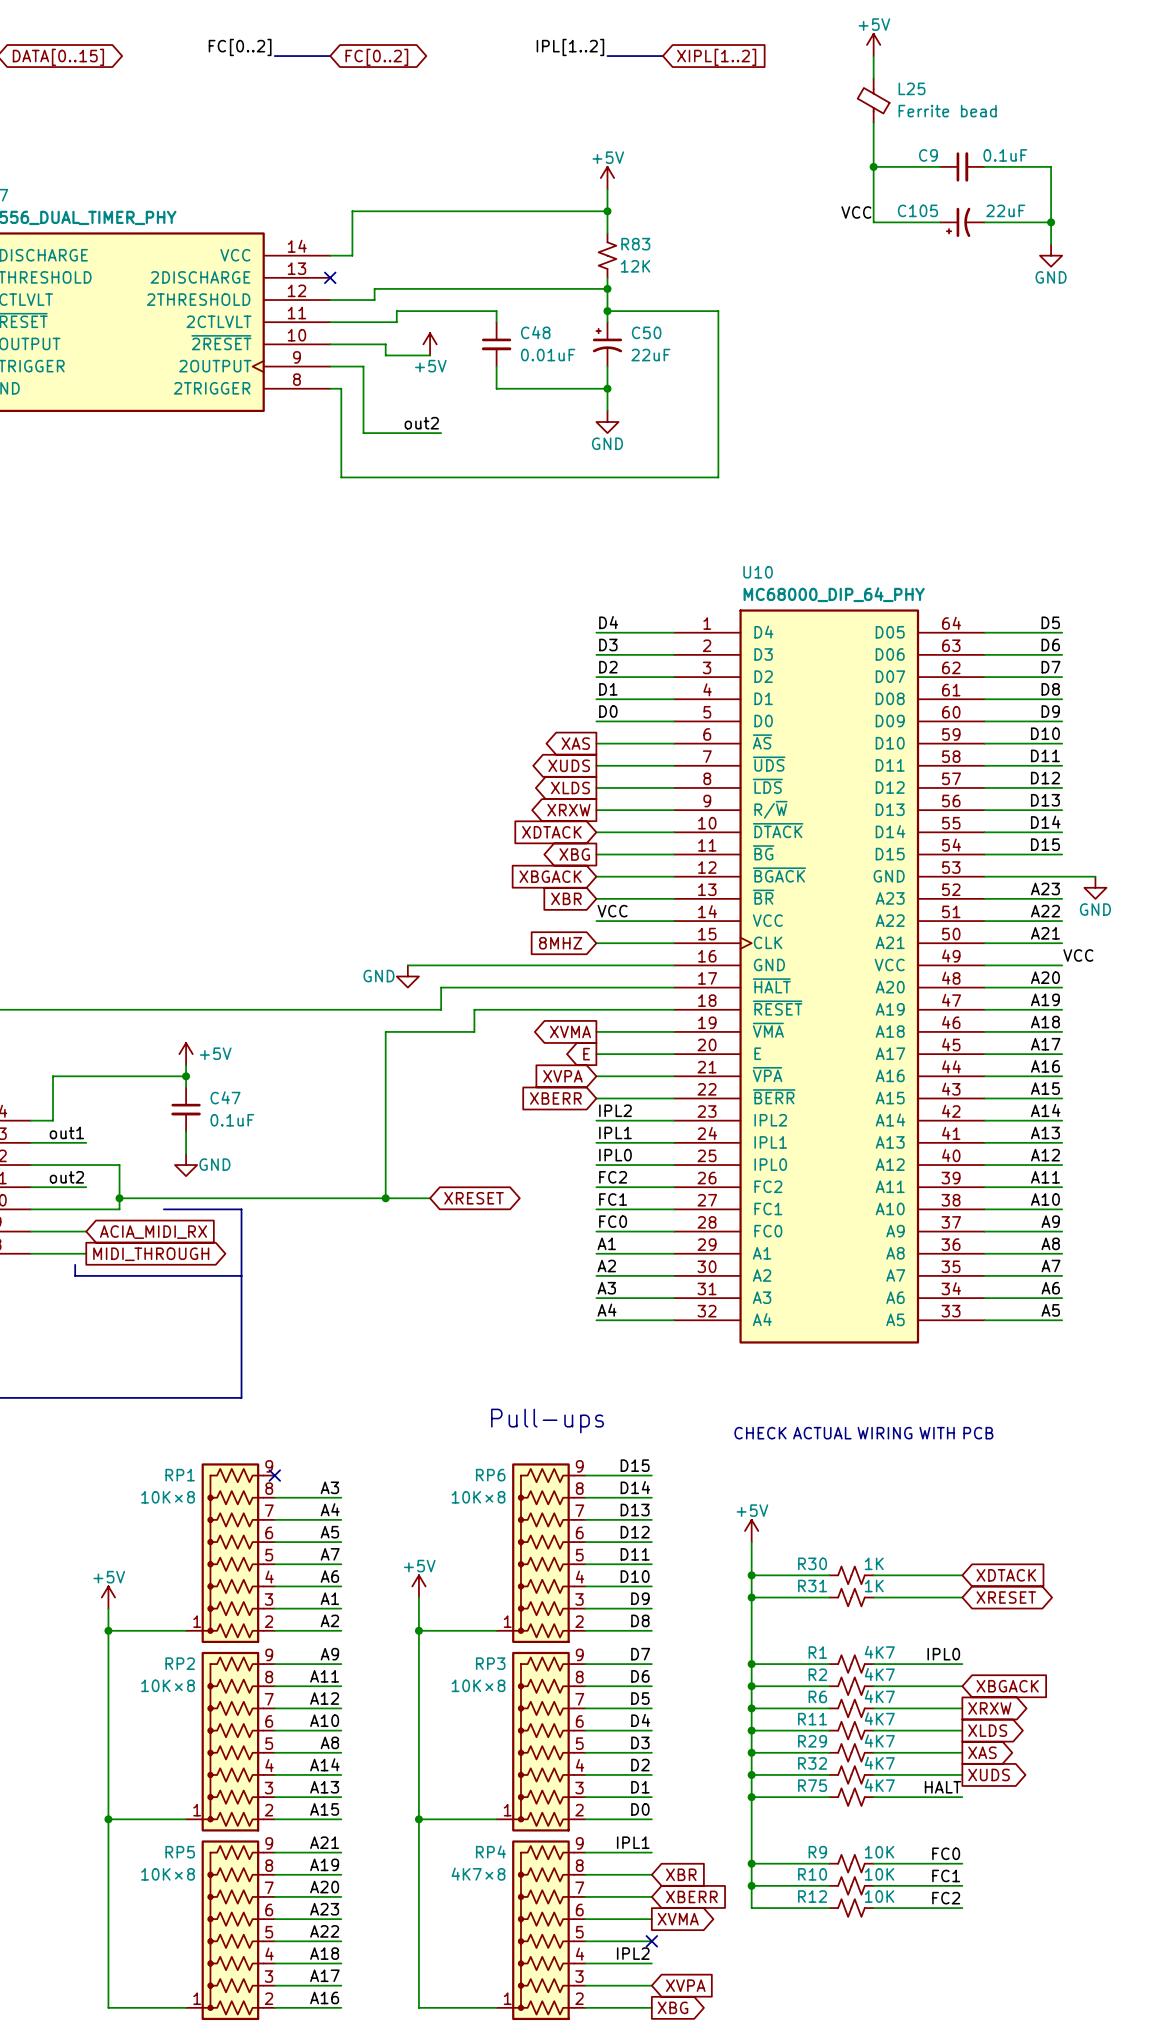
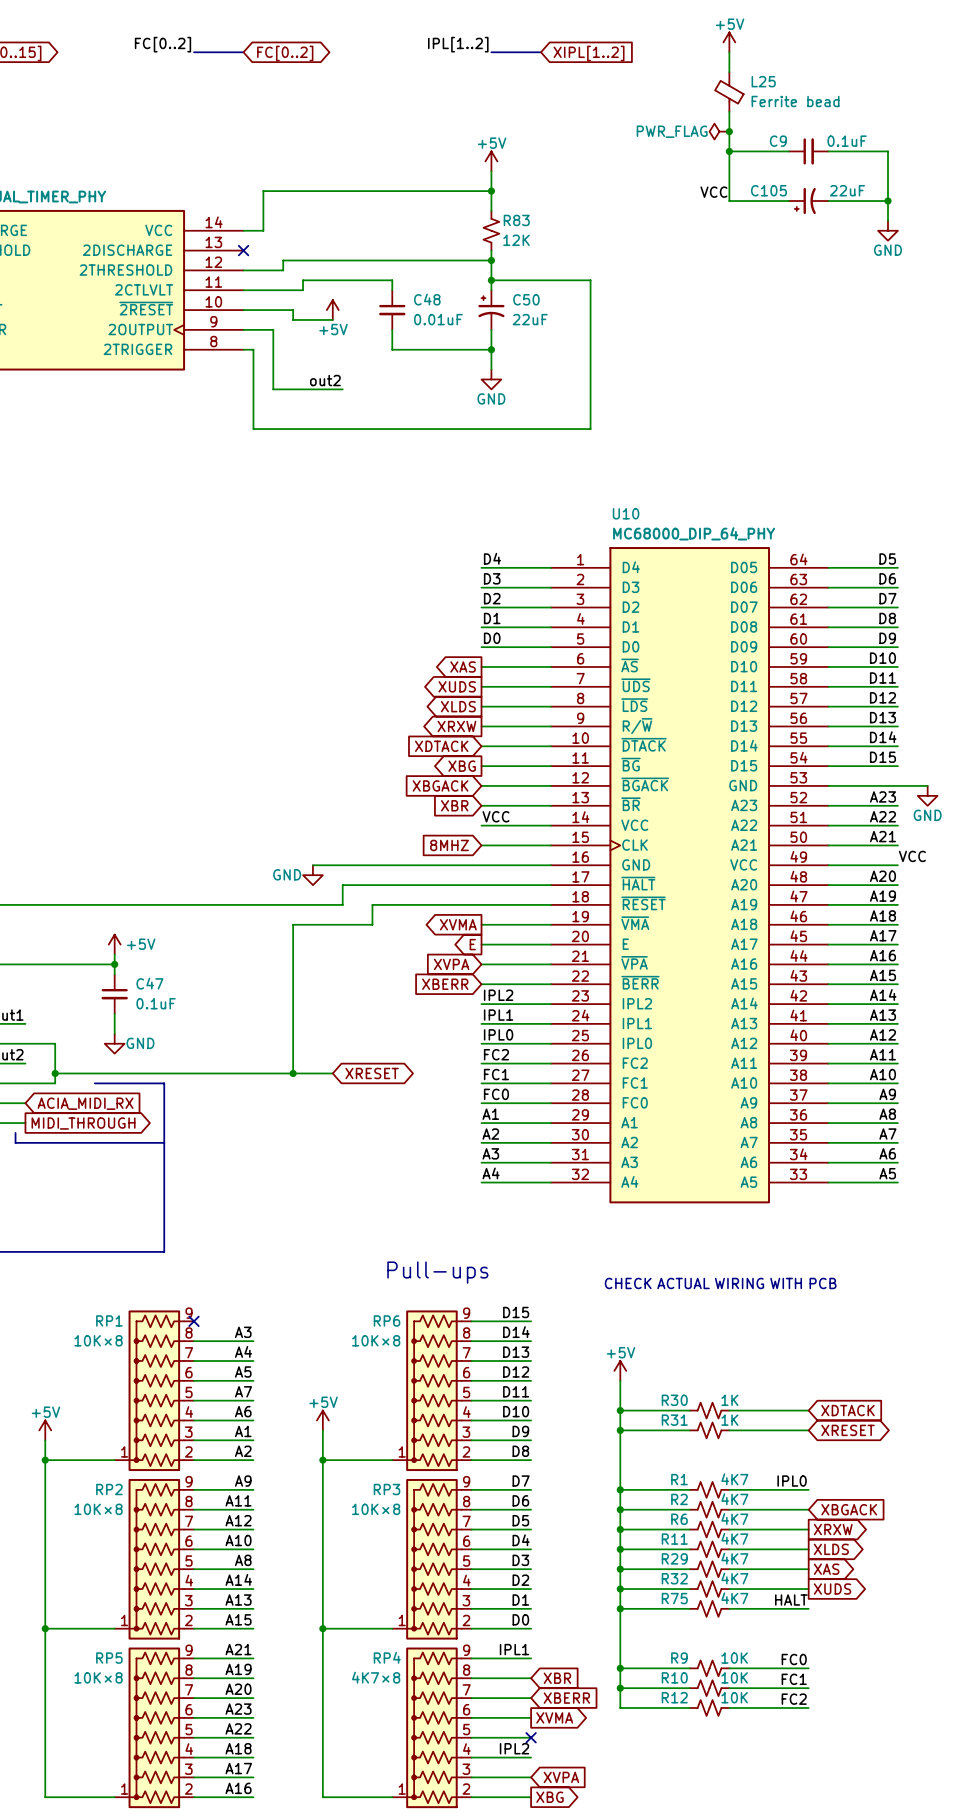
power symbol: none -> PWR_FLAG (719, 131)
junction: none -> (729, 131)

